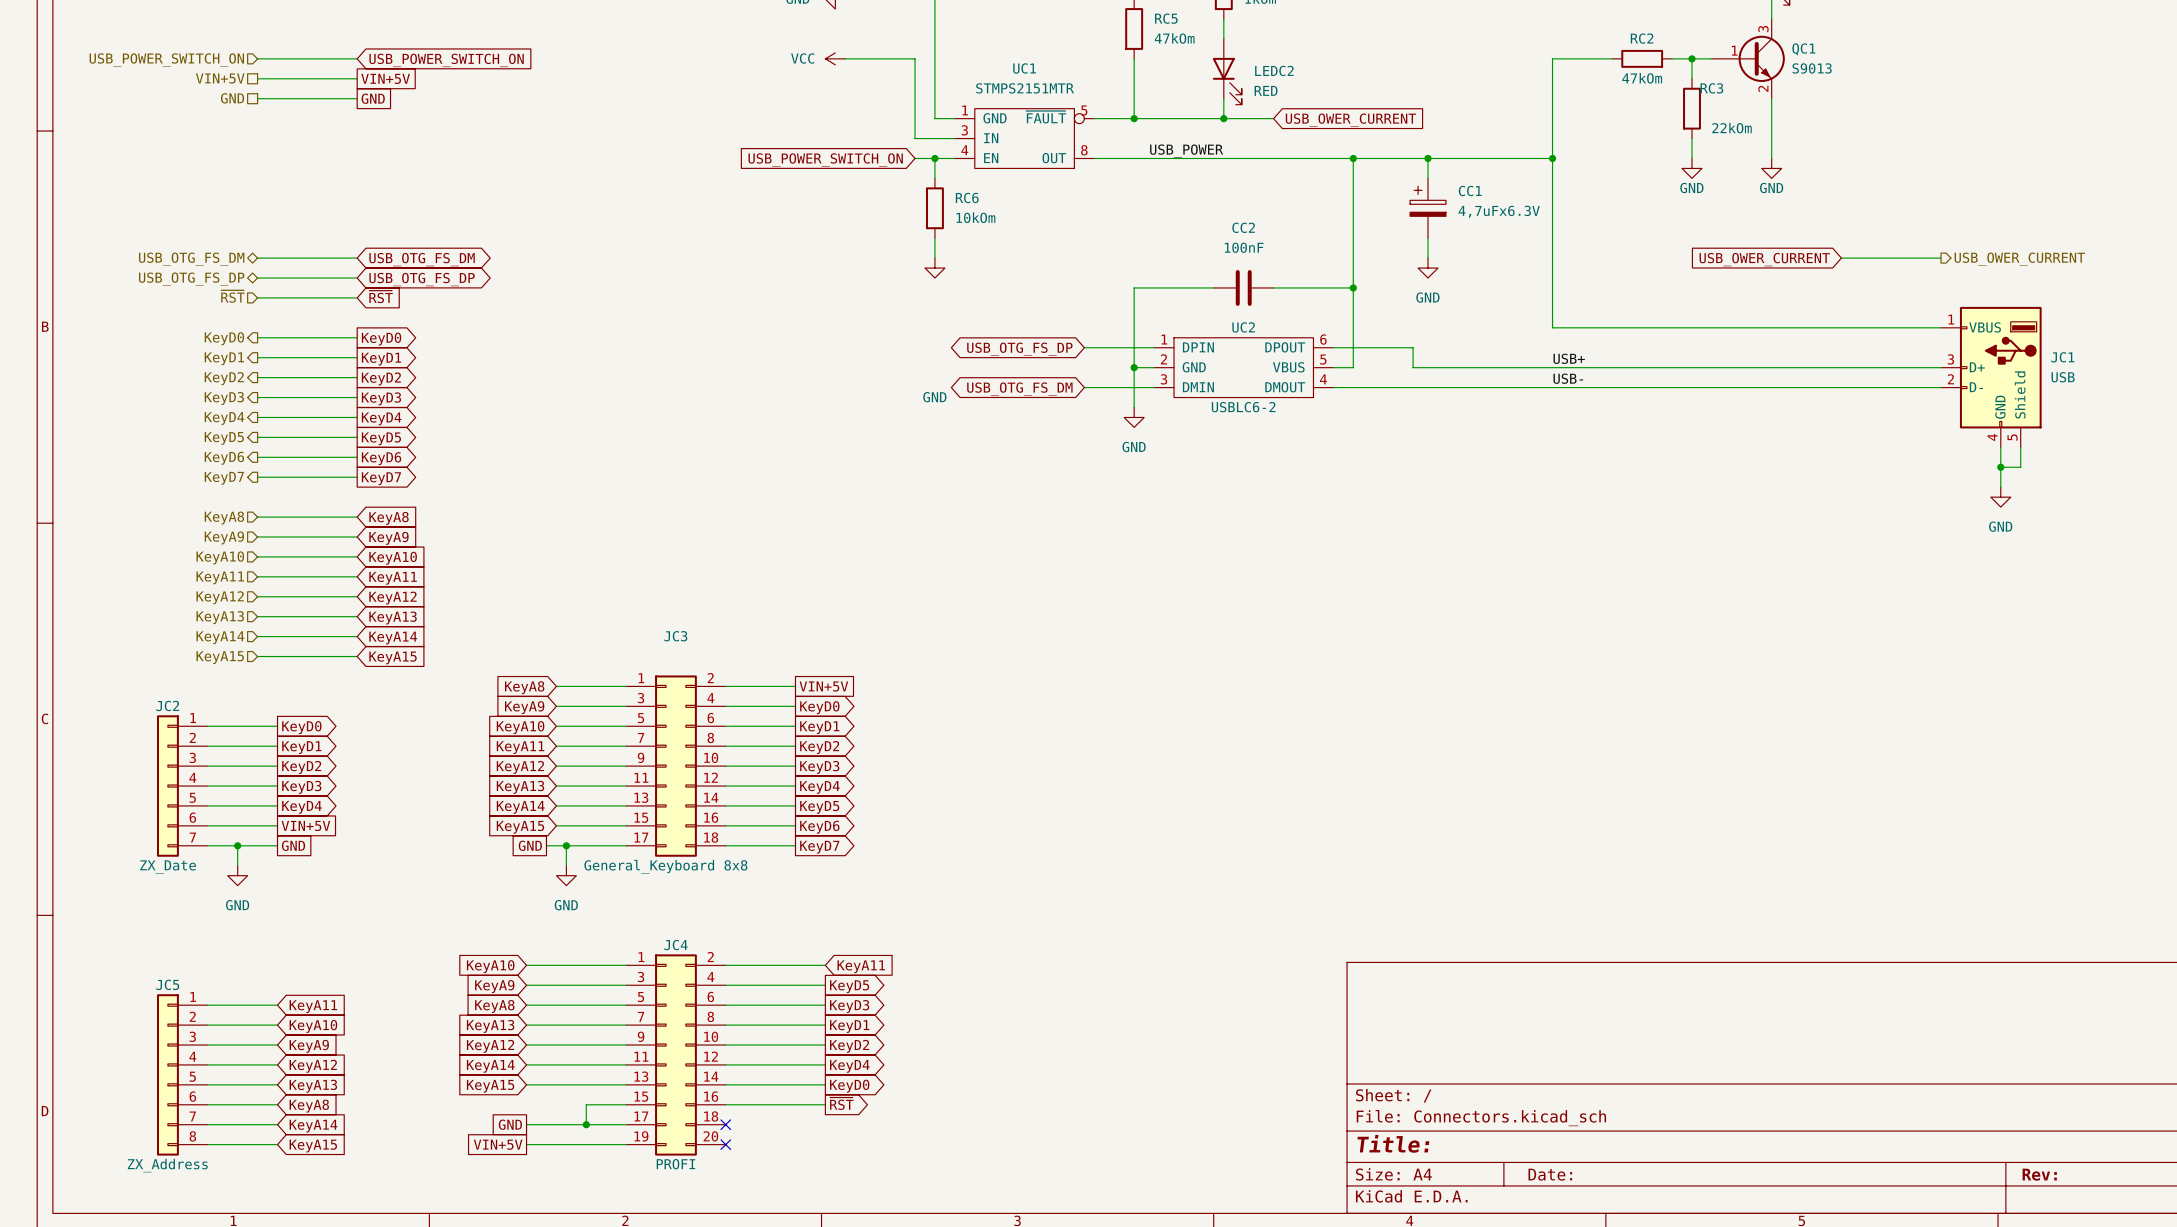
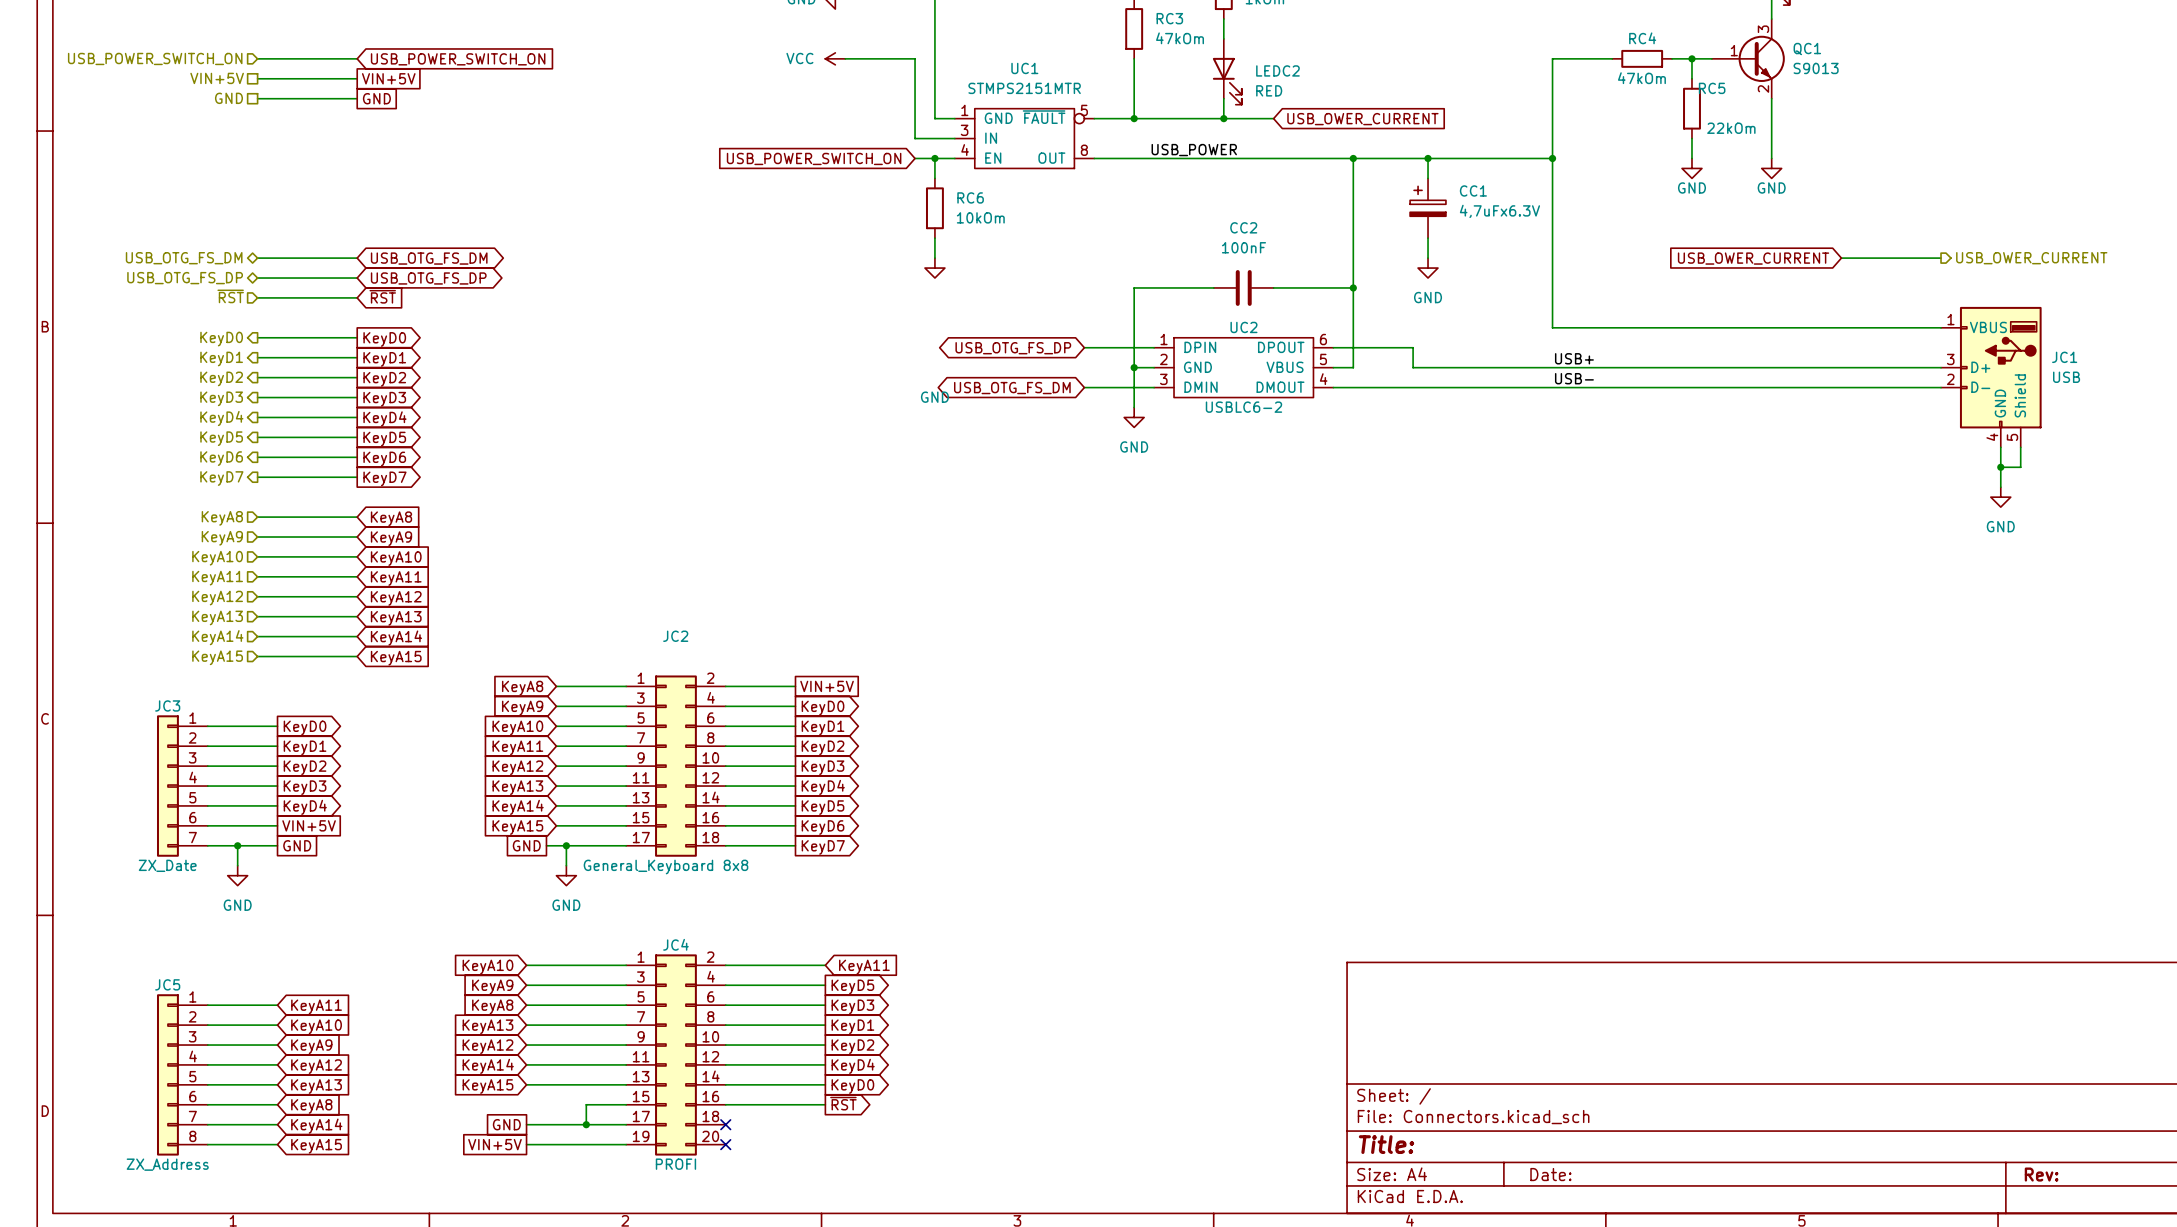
RC5 name: RC5 (1166, 18) -> RC3 (1169, 18)
RC2 name: RC2 (1642, 38) -> RC4 (1642, 38)
RC3 name: RC3 (1711, 88) -> RC5 (1712, 88)
JC3 name: JC3 (675, 636) -> JC2 (675, 636)
JC2 name: JC2 (167, 705) -> JC3 (167, 705)

